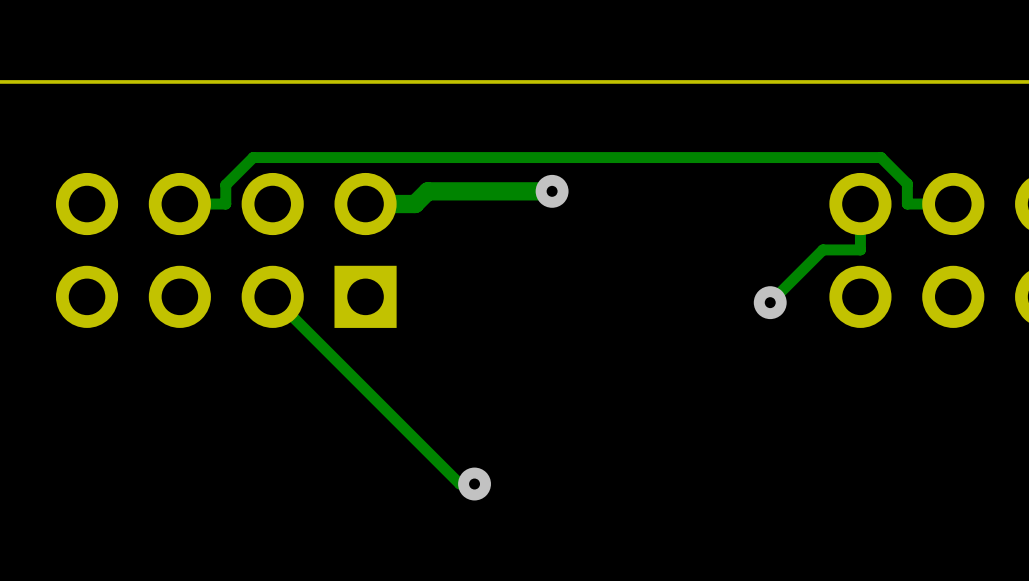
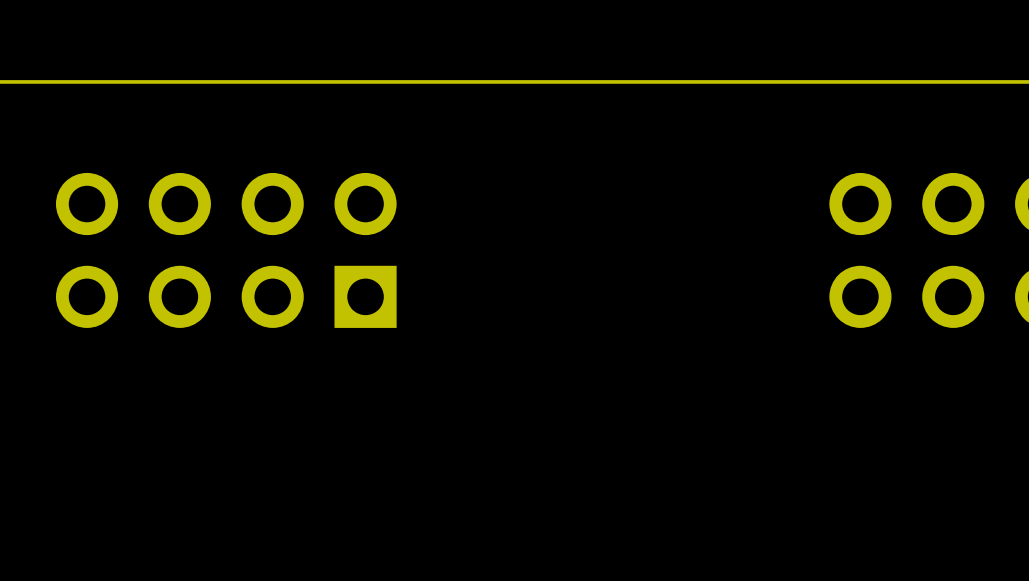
track: (552, 191) (427, 191) (415, 204) (365, 204) -> none
via: (552, 191) -> none
track: (860, 204) (860, 249) (822, 249) (770, 302) -> none
track: (953, 204) (907, 204) (907, 183) (880, 157) (253, 157) (225, 185) (225, 204) (179, 204) -> none
track: (272, 296) (459, 484) (474, 484) -> none
via: (770, 302) -> none
via: (474, 484) -> none

